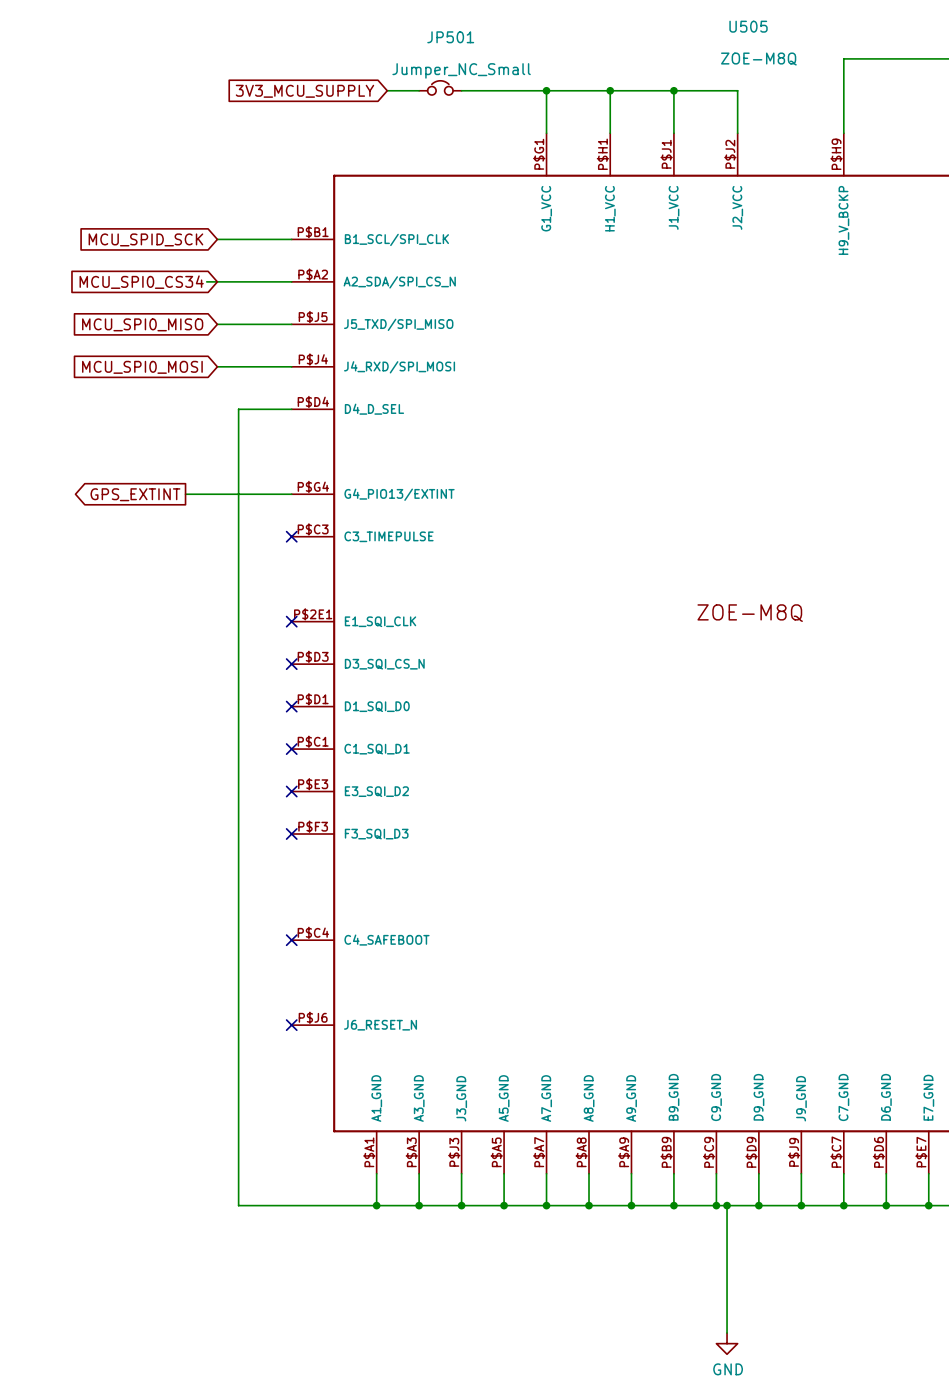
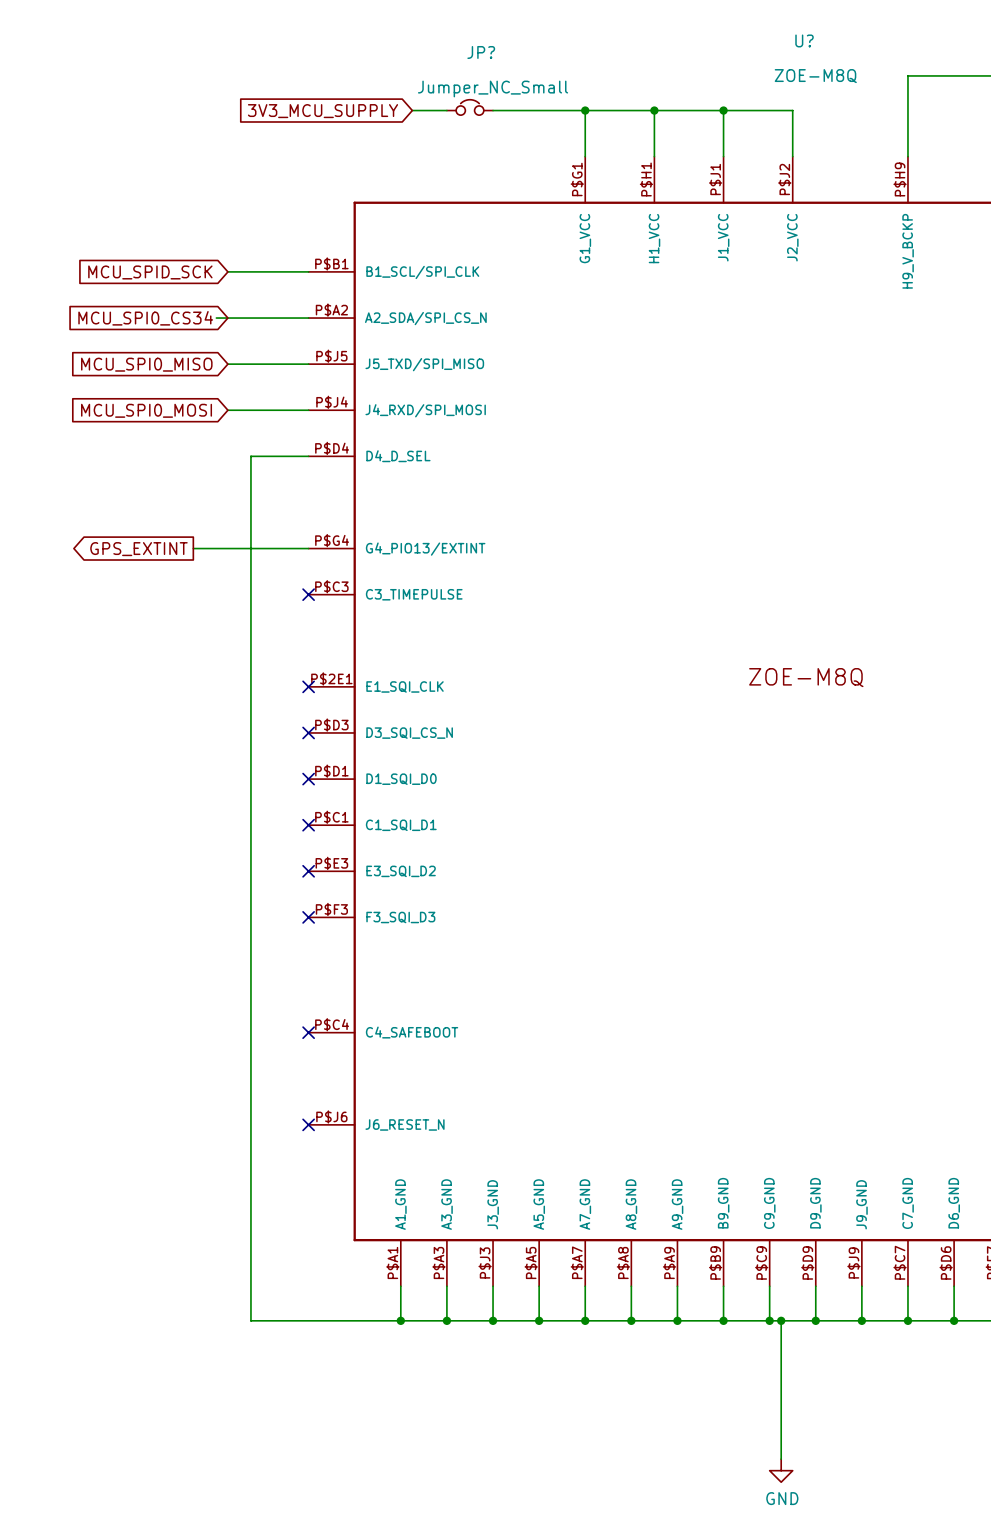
U505 name: U505 (748, 26) -> U? (804, 40)
JP501 name: JP501 (450, 37) -> JP? (481, 52)

